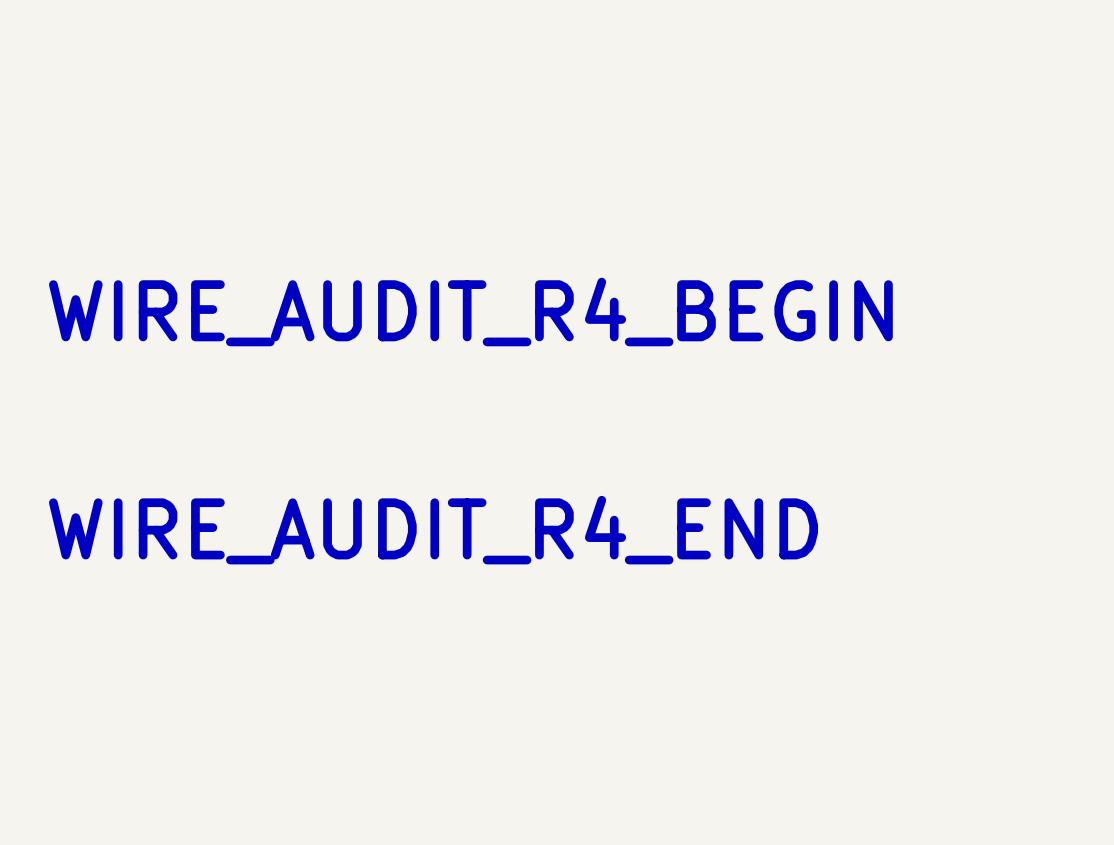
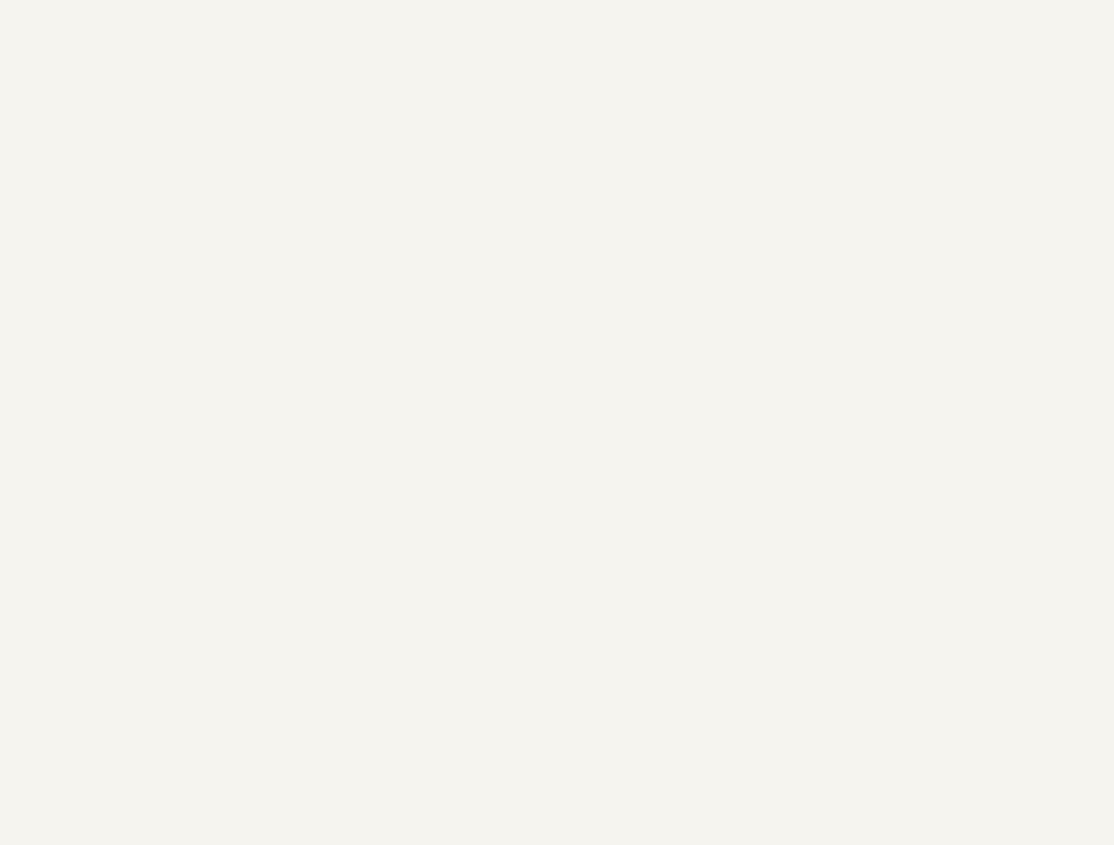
text: WIRE_AUDIT_R4_BEGIN (470, 312) -> none
text: WIRE_AUDIT_R4_END (433, 530) -> none

